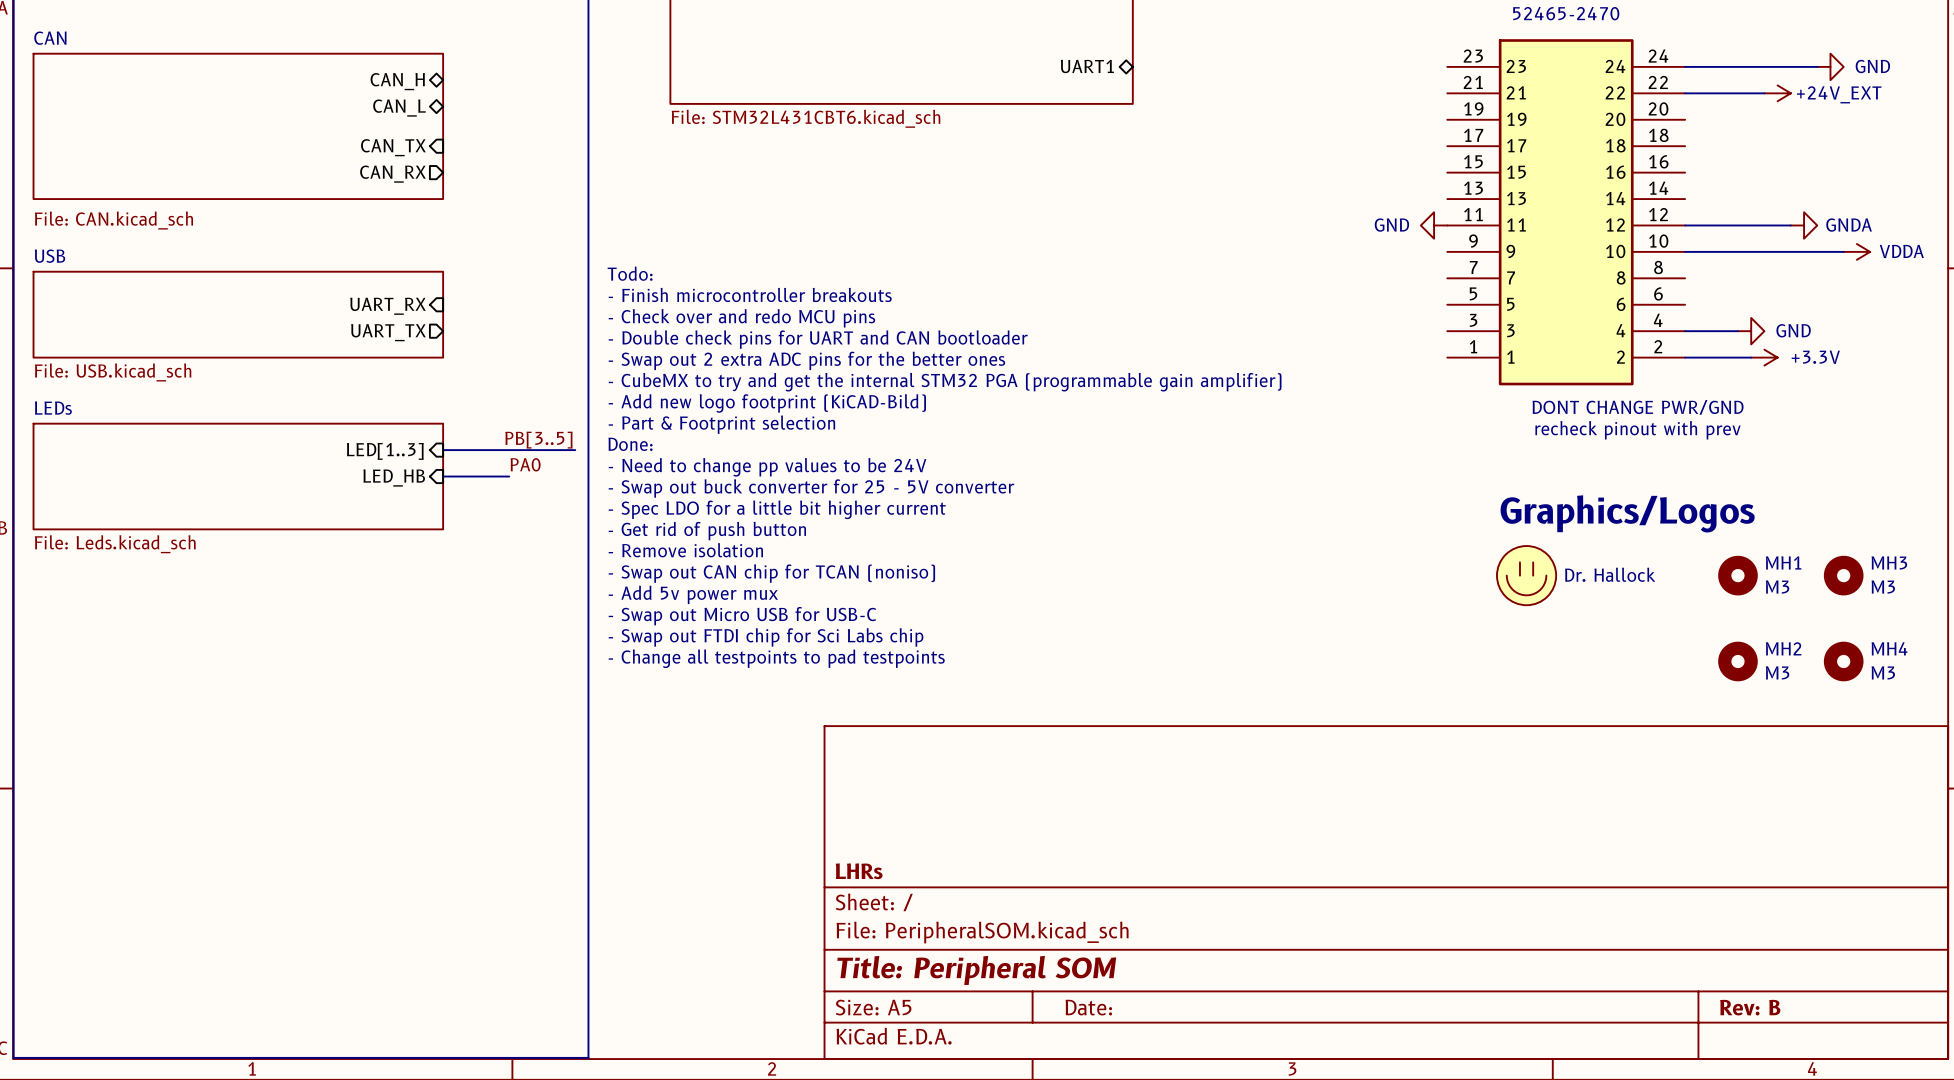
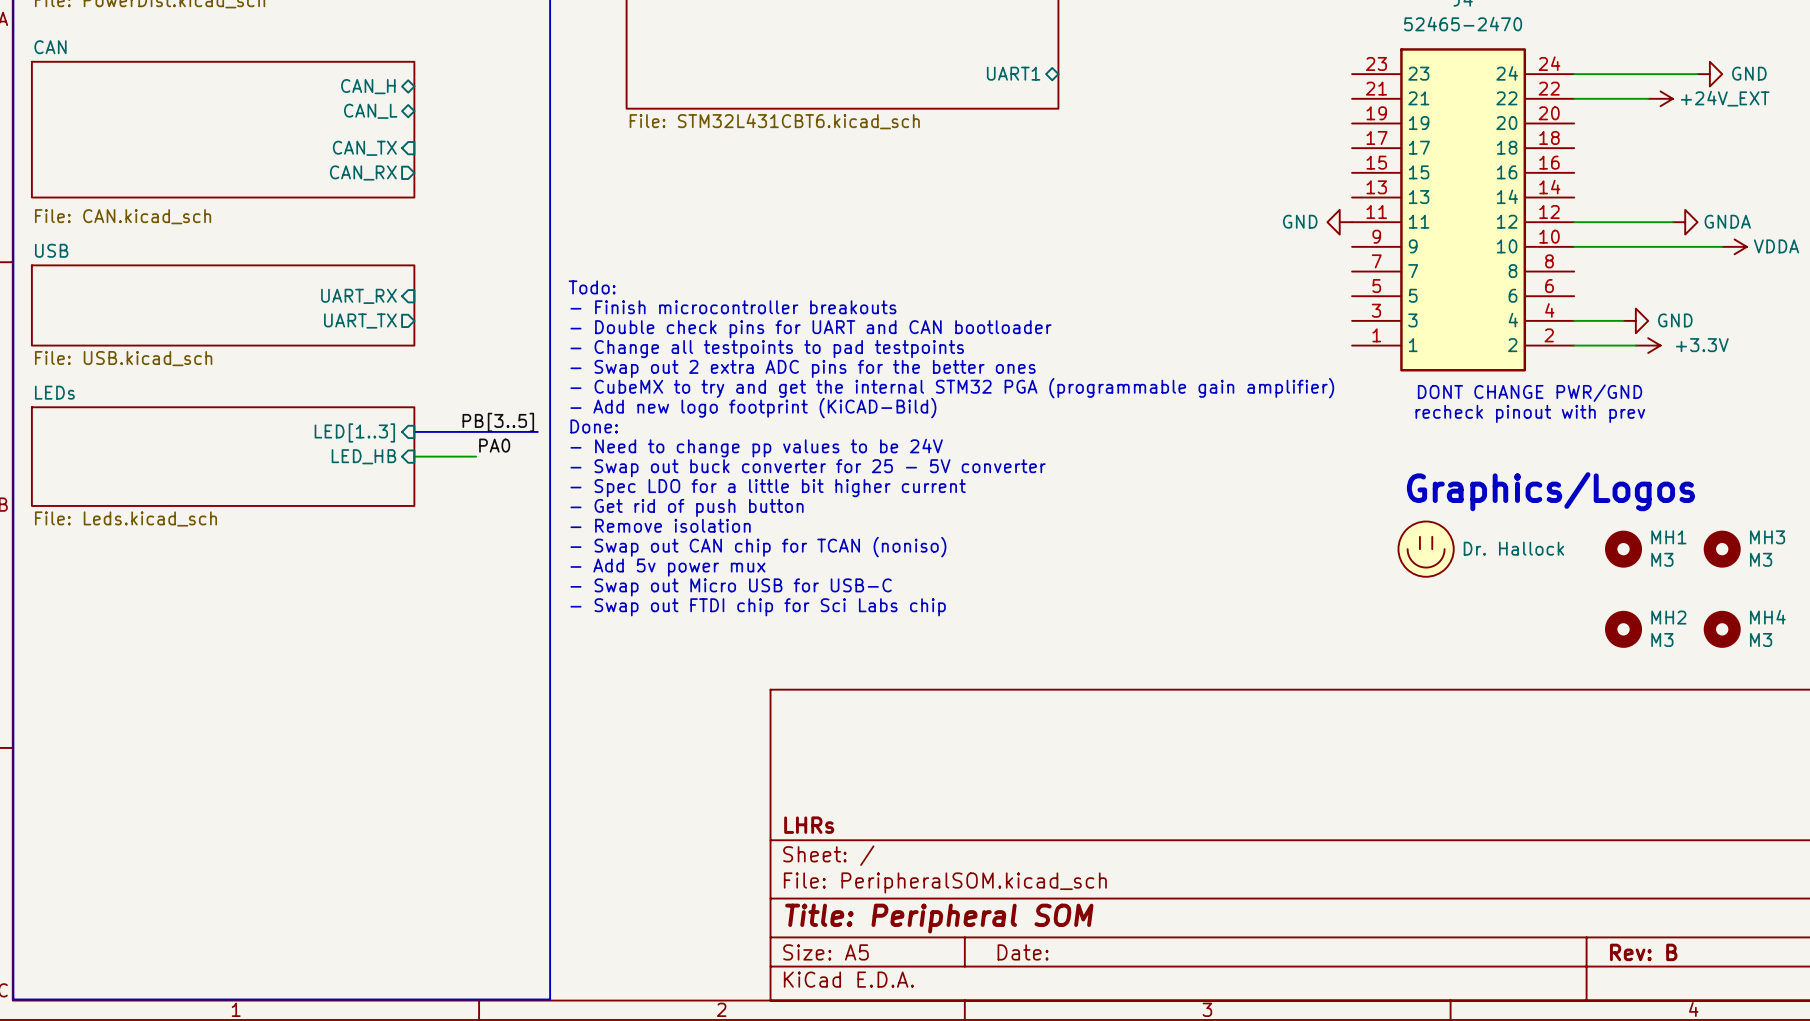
text: Todo: (630, 273) -> none
text: - Finish microcontroller breakouts (750, 294) -> Todo: (592, 287)
text: - Check over and redo MCU pins (741, 318) -> - Finish microcontroller breakouts (733, 307)
text: - Swap out 2 extra ADC pins for the better ones (806, 360) -> - Change all testpoints to pad testpoints (767, 349)
text: - CubeMX to try and get the internal STM32 PGA (programmable gain amplifier) (945, 382) -> - Swap out 2 extra ADC pins for the better ones (803, 368)
text: - Add new logo footprint (KiCAD-Bild) (767, 403) -> - CubeMX to try and get the internal STM32 PGA (programmable gain amplifier) (952, 388)
text: - Part & Footprint selection (721, 424) -> - Add new logo footprint (KiCAD-Bild) (753, 408)
text: - Change all testpoints to pad testpoints (776, 658) -> none

